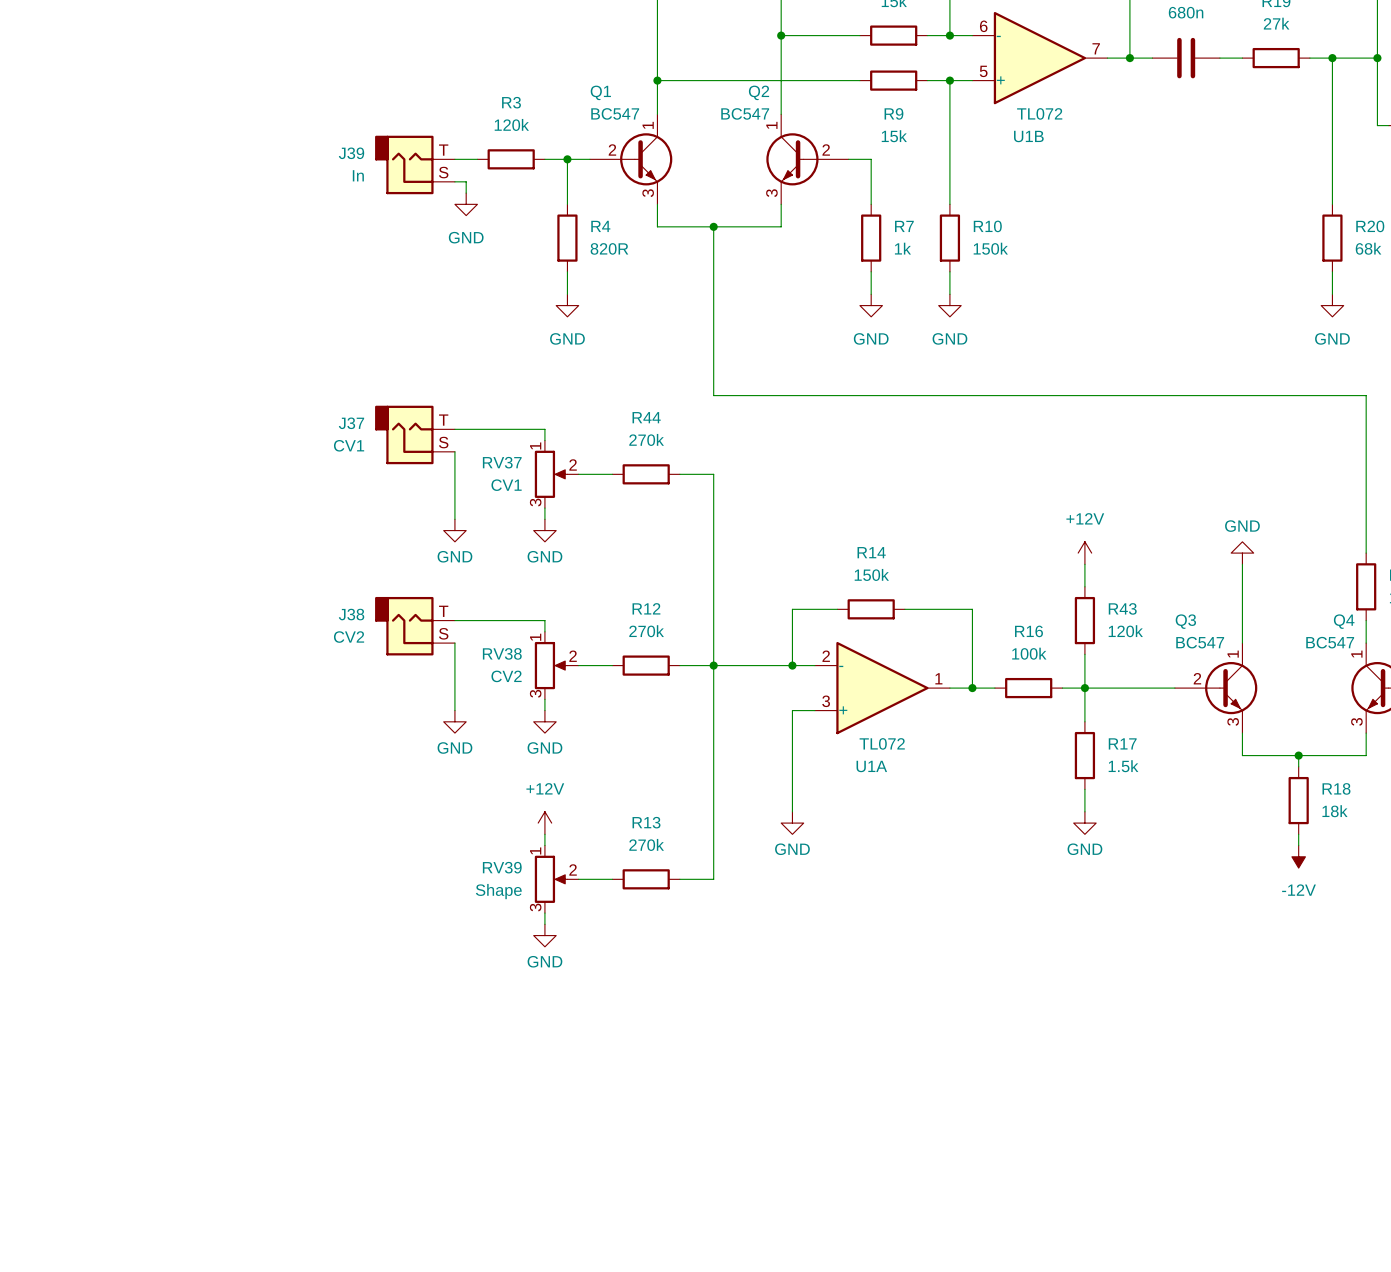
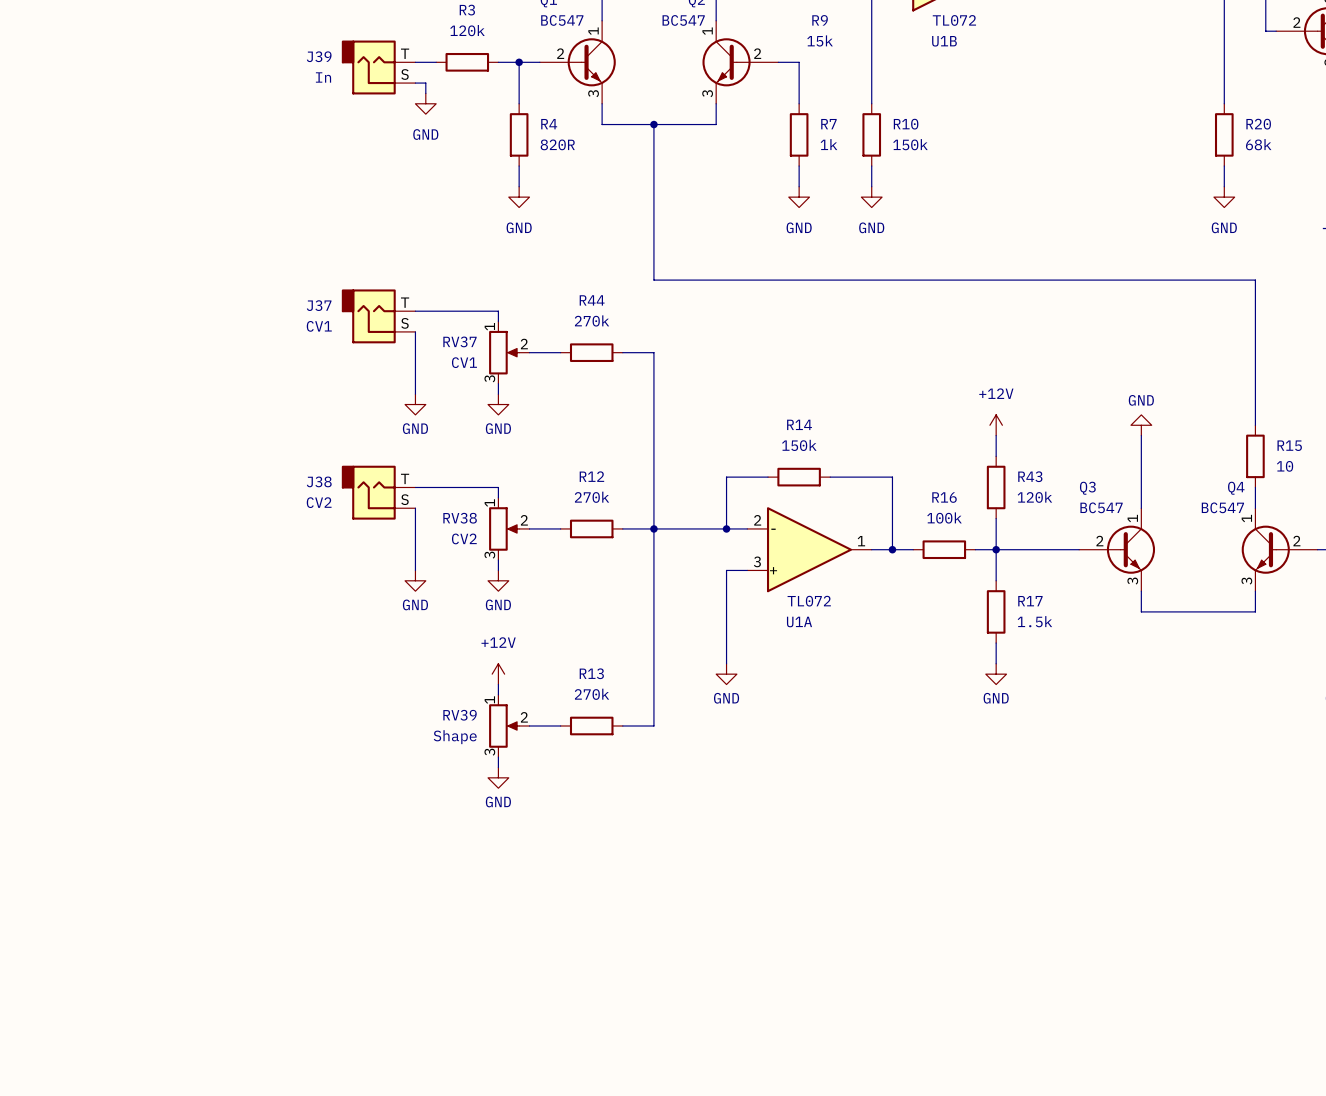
wire: (1298, 755) (1298, 766) -> none
junction: (1298, 755) -> none
R18: 18k (1298, 800) -> none
wire: (1298, 834) (1298, 845) -> none
power symbol: -12V (1298, 856) -> none

